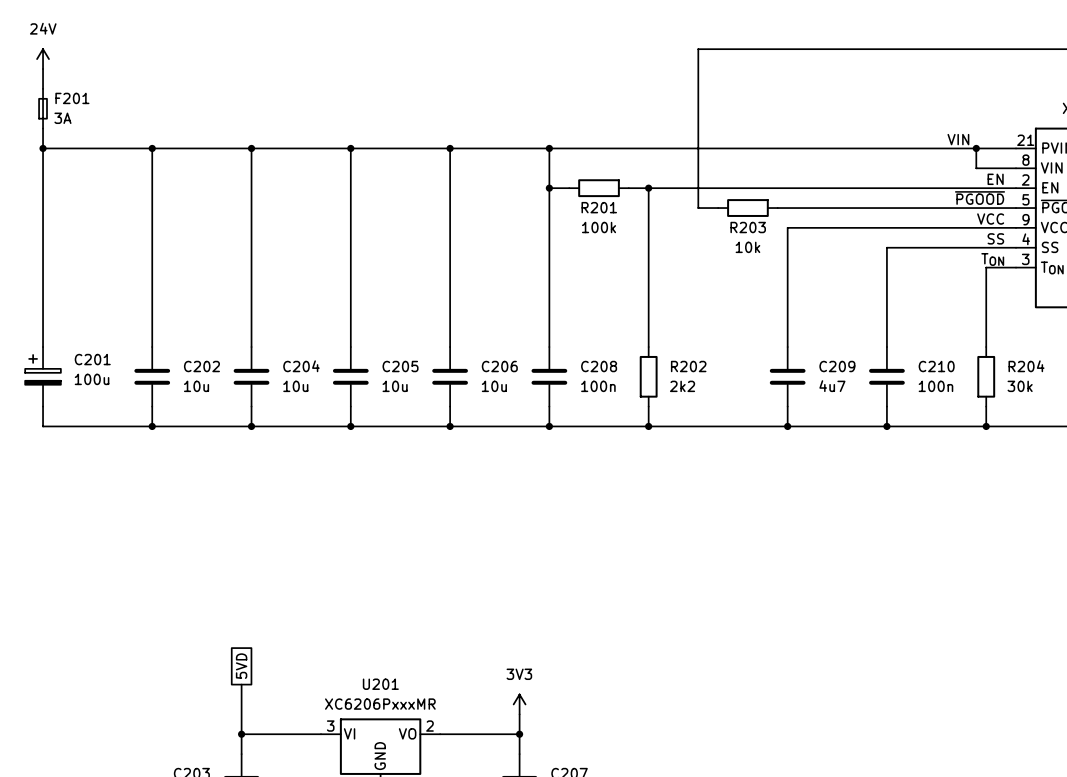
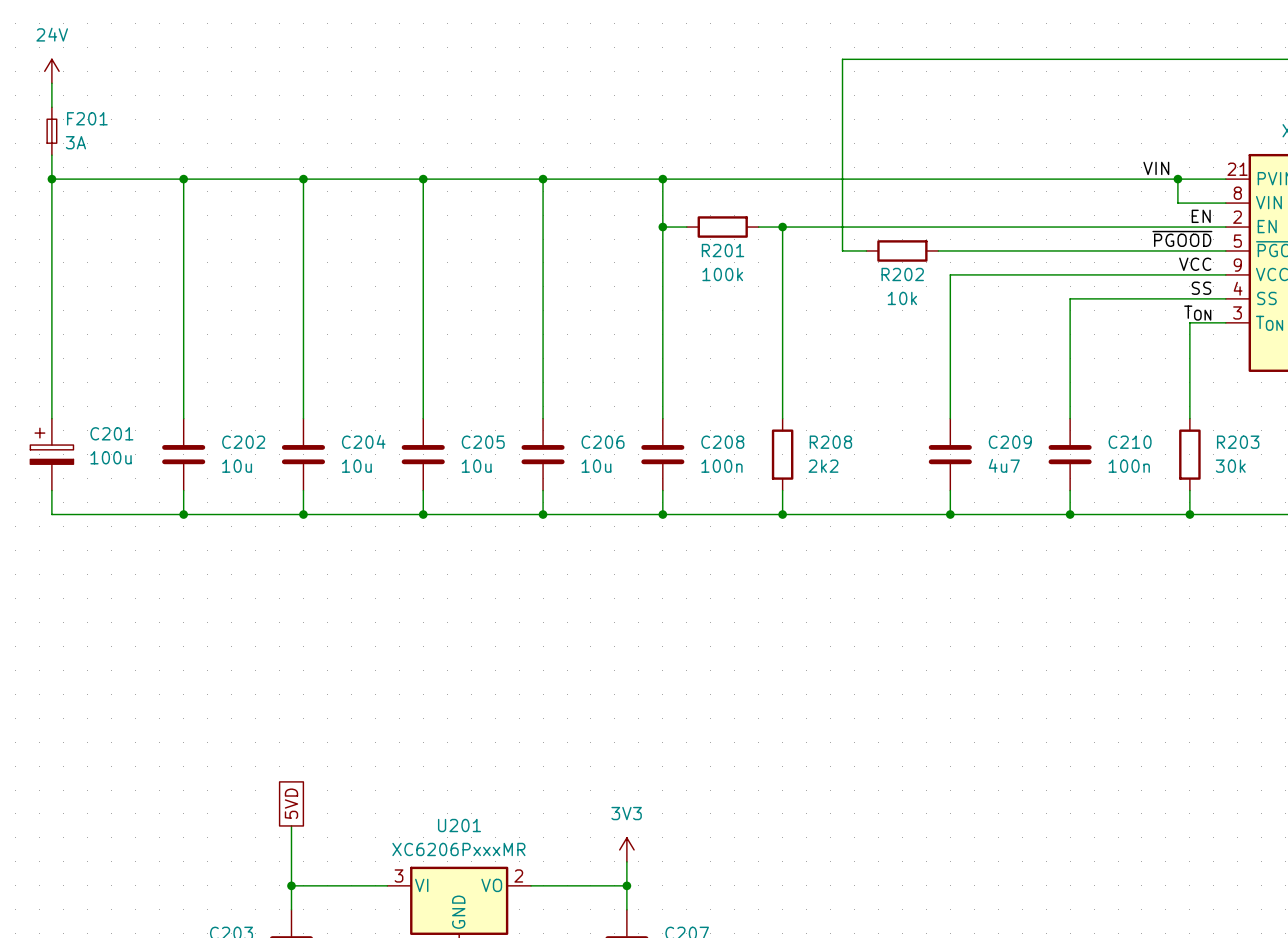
R203 name: R203 (748, 227) -> R202 (902, 274)
R202 name: R202 (688, 366) -> R208 (830, 442)
R204 name: R204 (1026, 366) -> R203 (1238, 442)

